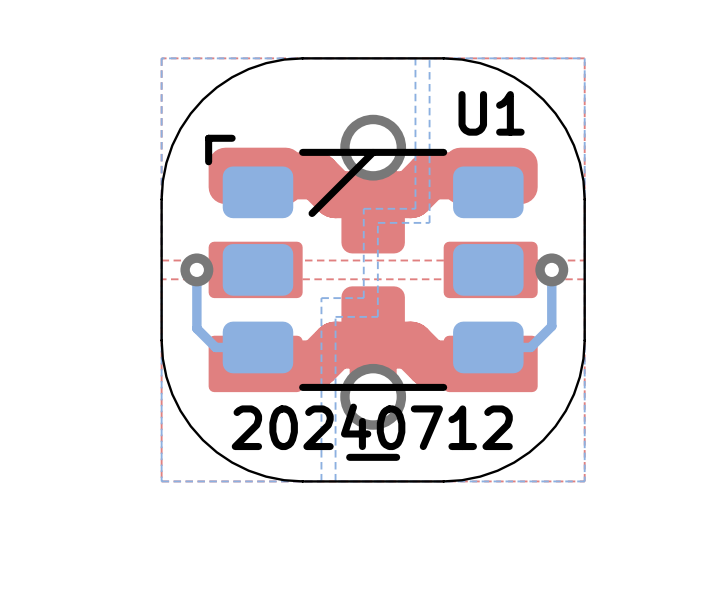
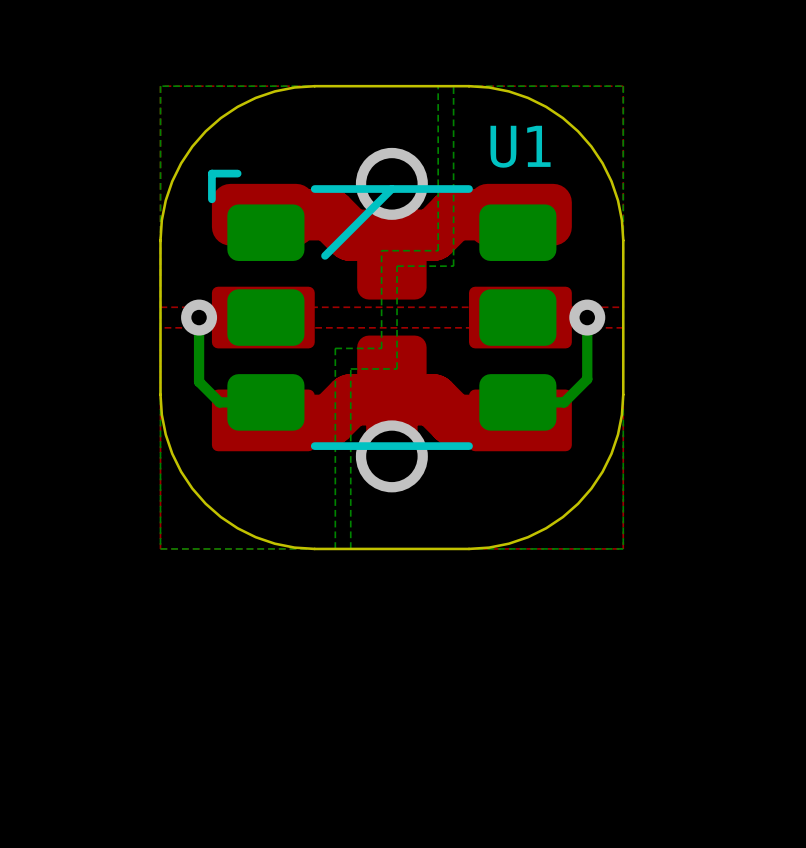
drawing: [346, 453, 401, 461] -> none

